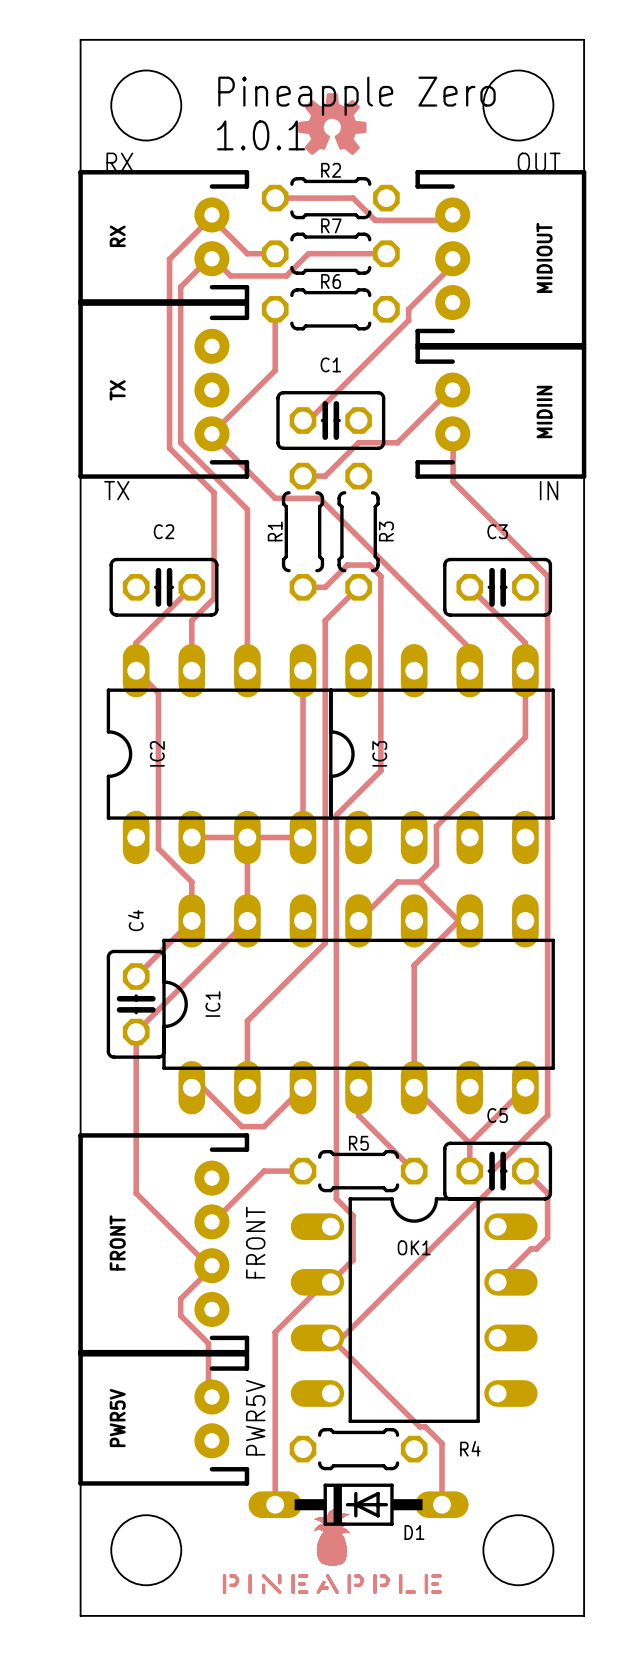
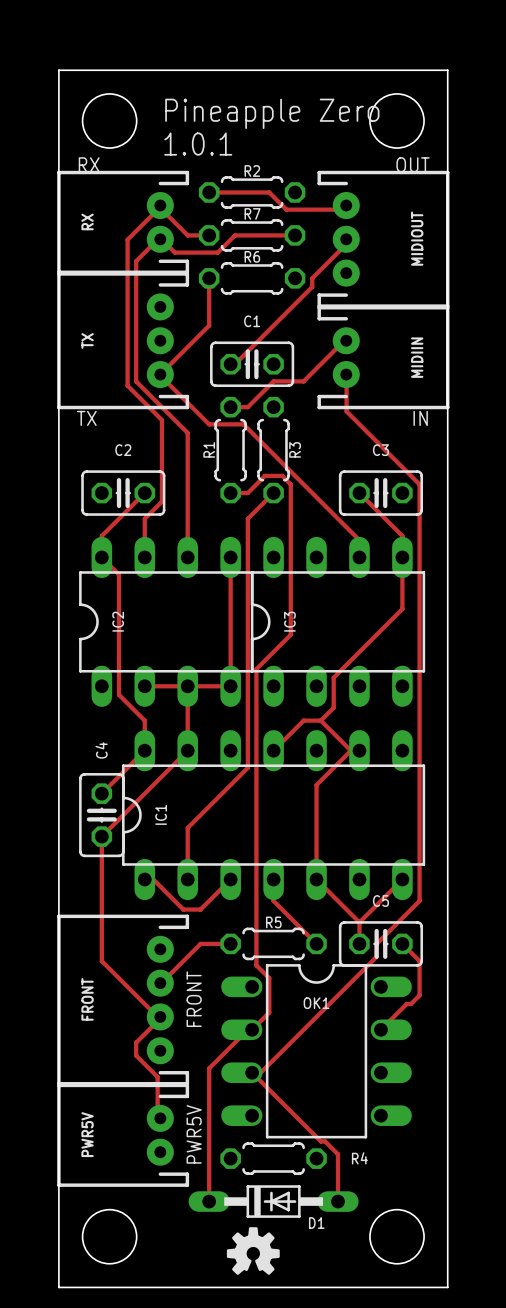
drawing: [298, 93, 367, 155] -> none
drawing shape: [222, 1507, 442, 1595] -> [226, 1227, 280, 1275]

